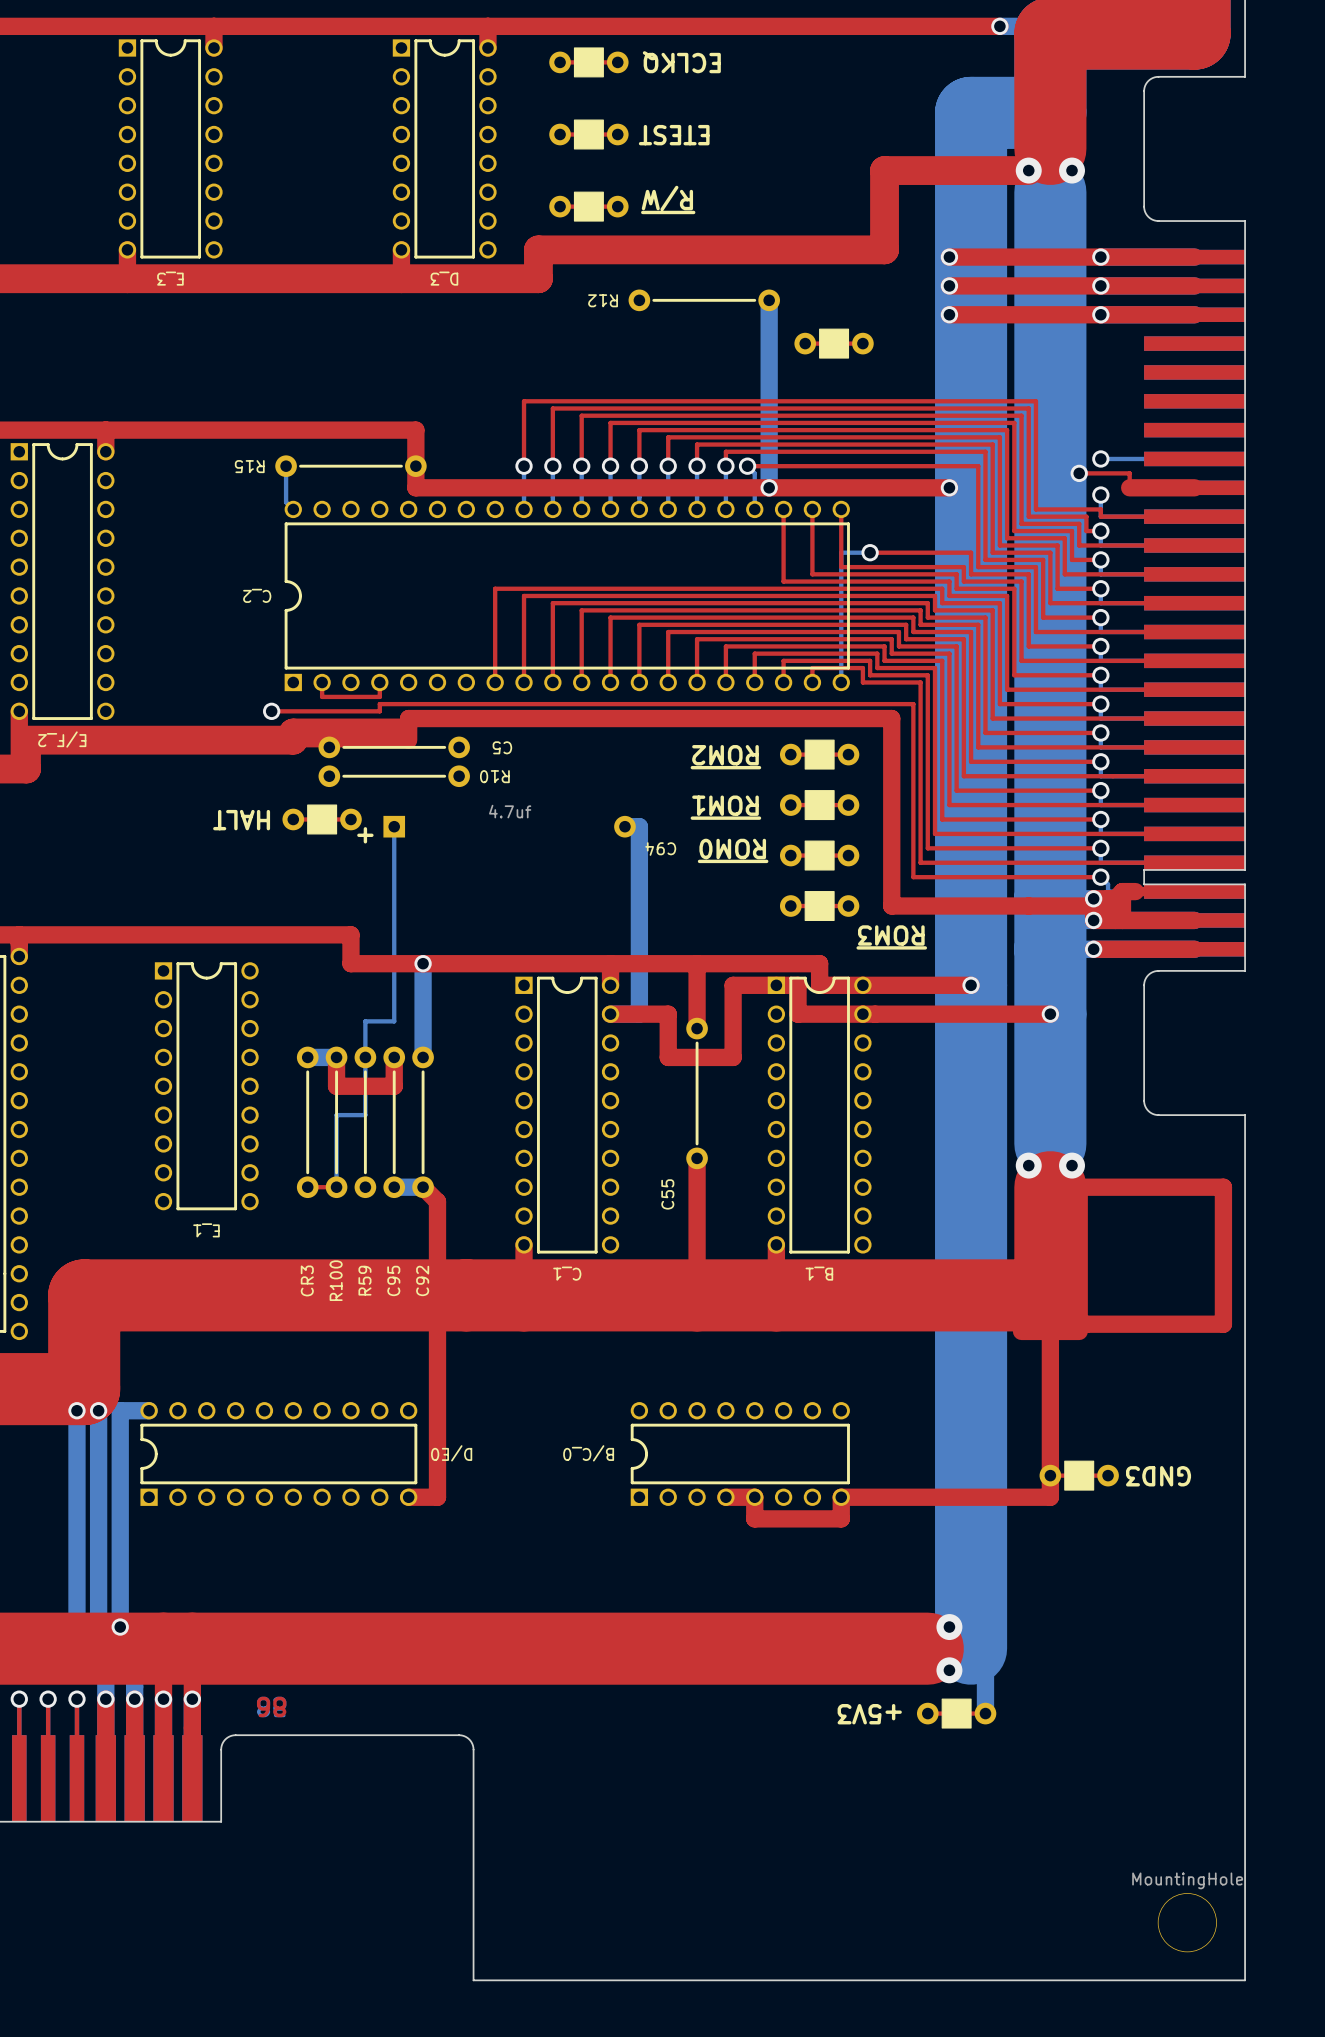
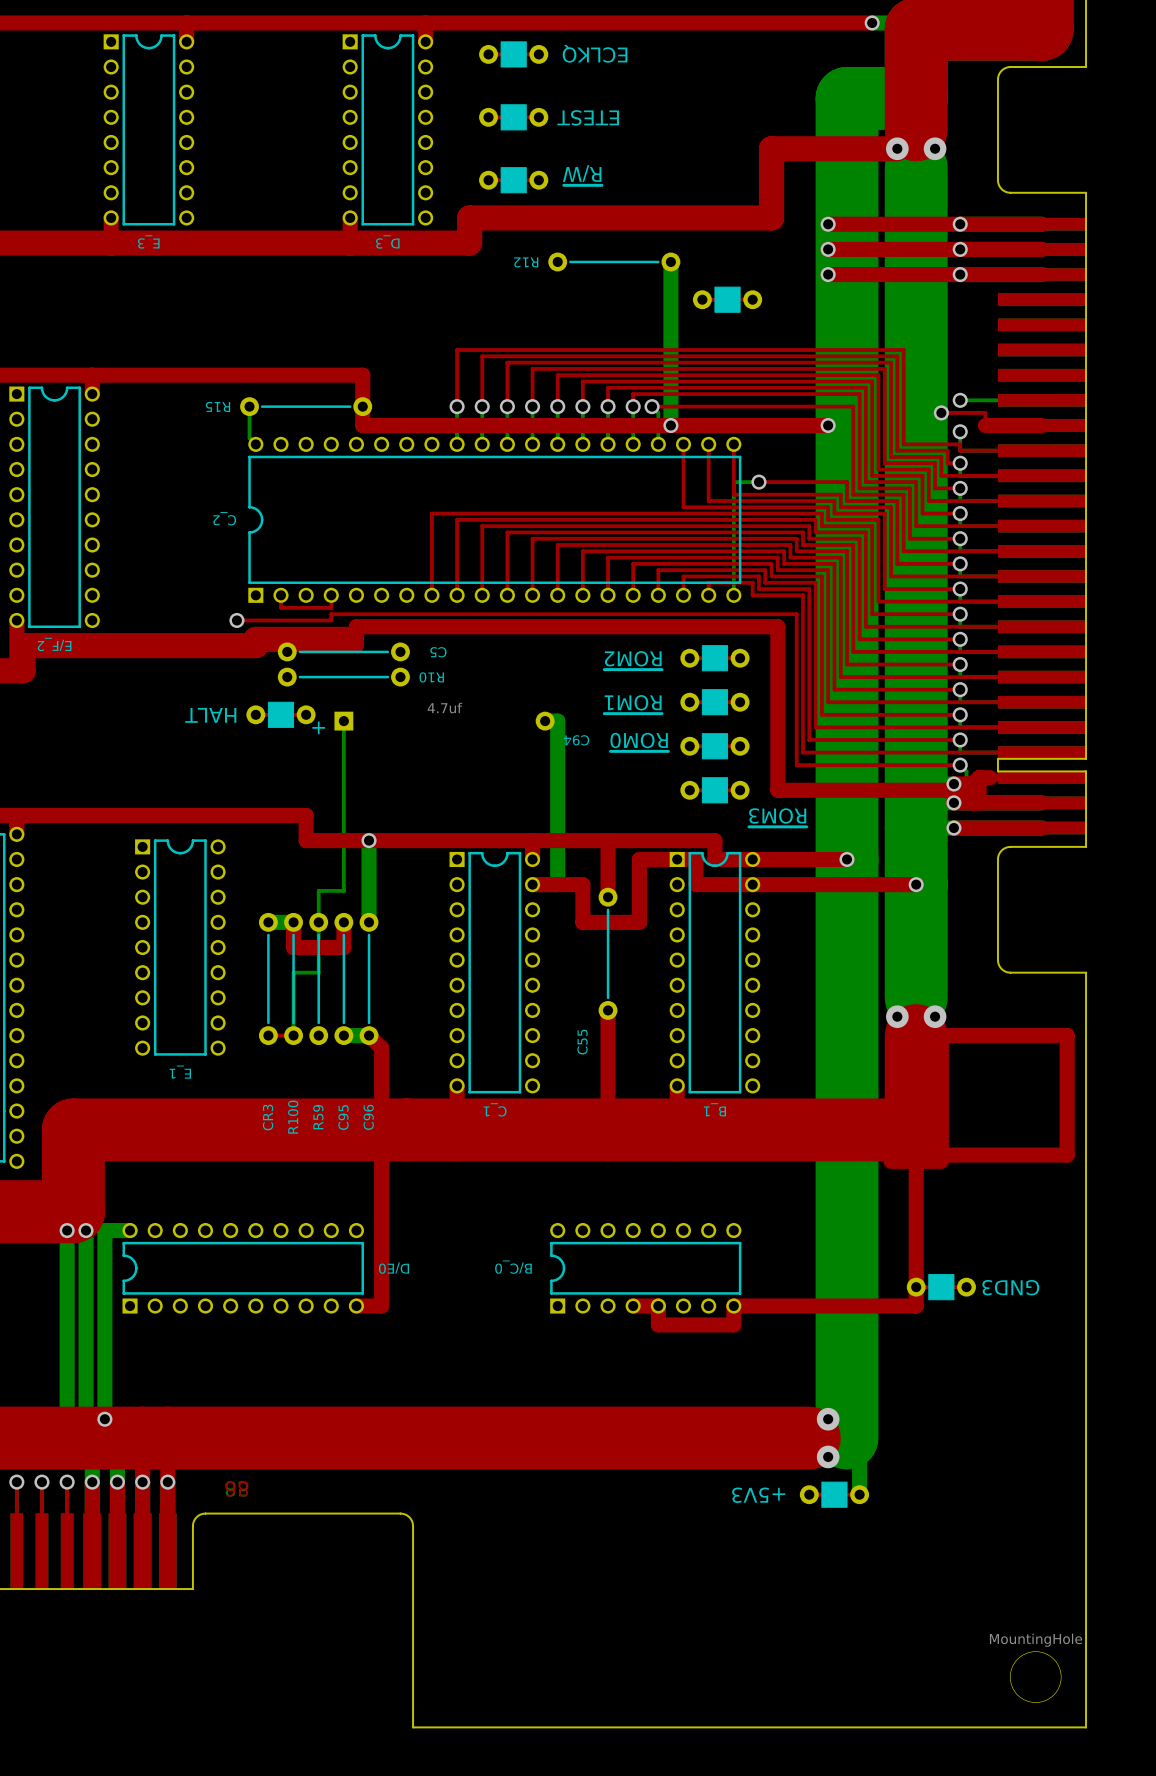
C92 name: C92 (422, 1280) -> C96 (368, 1117)

